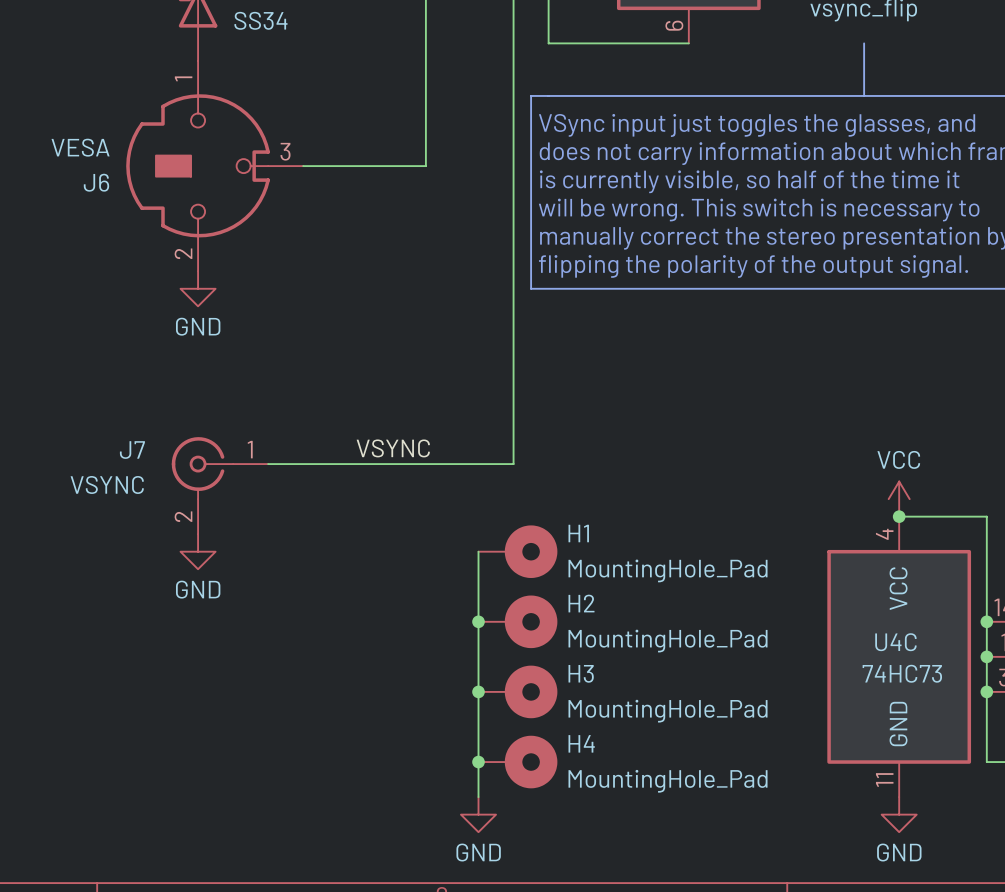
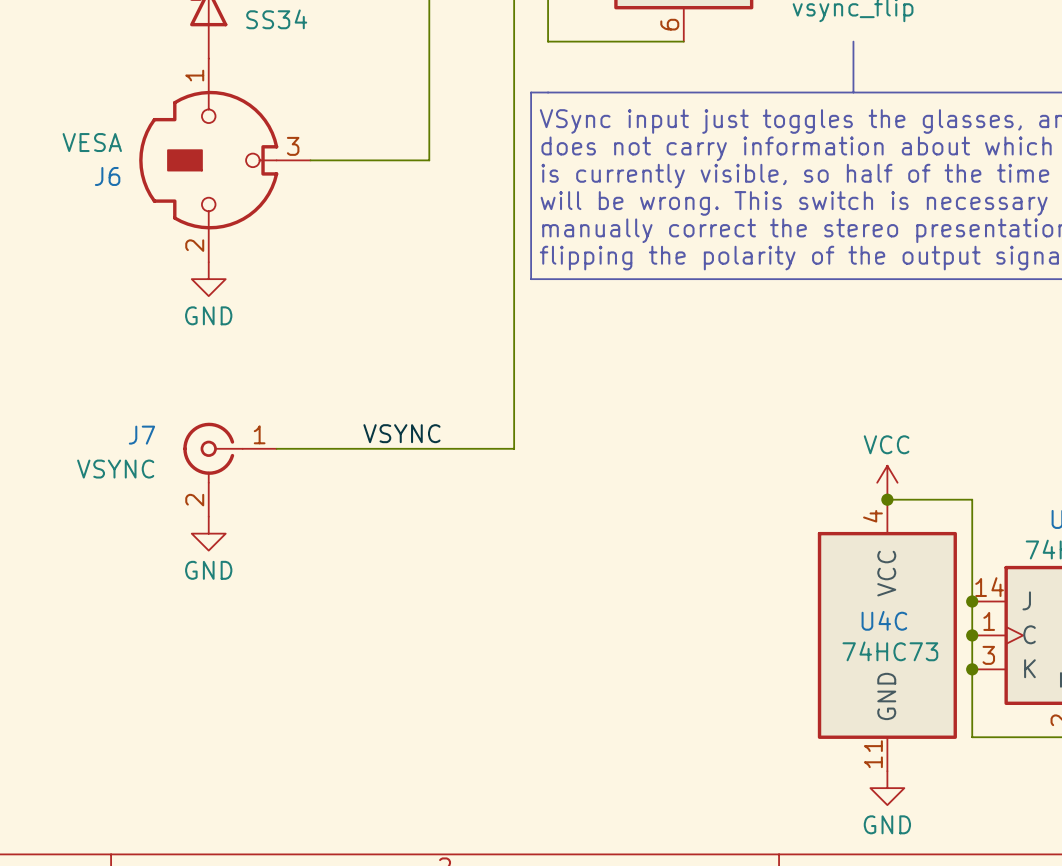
wire: (478, 551) (478, 797) -> none
H1: MountingHole_Pad (517, 551) -> none
junction: (478, 621) -> none
H2: MountingHole_Pad (517, 621) -> none
junction: (478, 691) -> none
H3: MountingHole_Pad (517, 691) -> none
junction: (478, 762) -> none
H4: MountingHole_Pad (517, 762) -> none
power symbol: GND (478, 814) -> none

